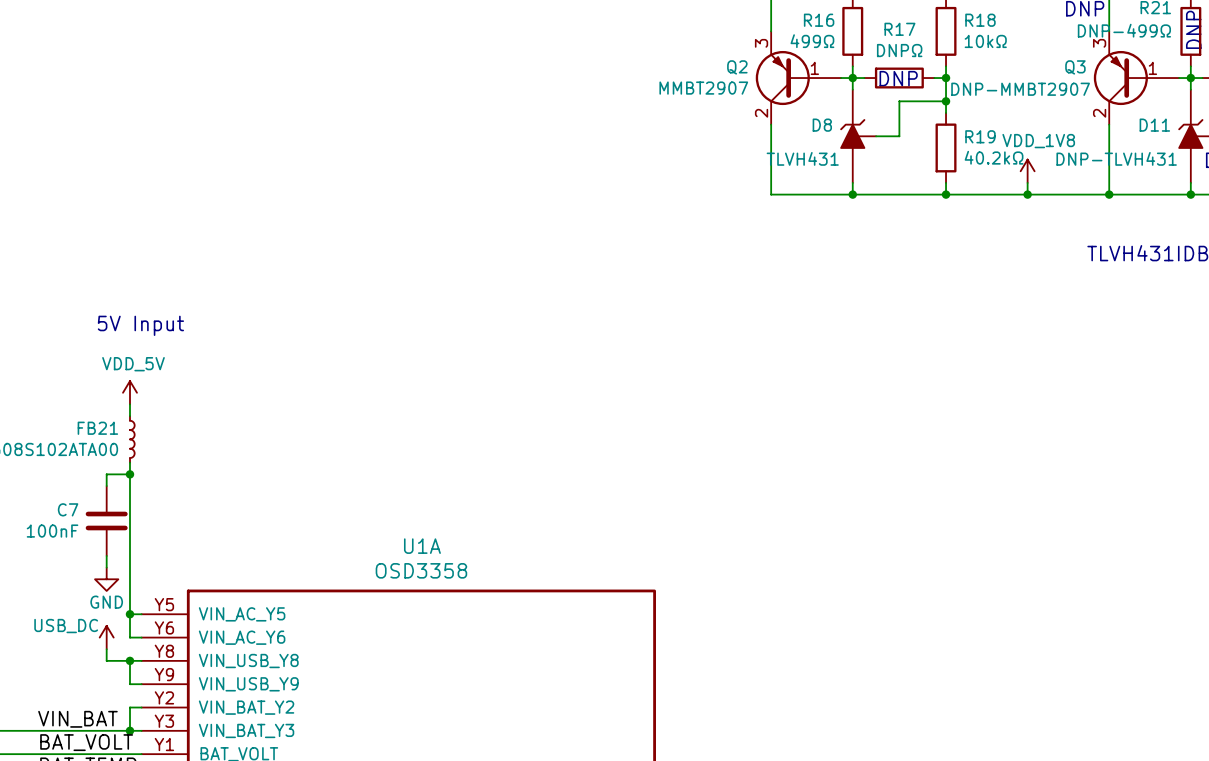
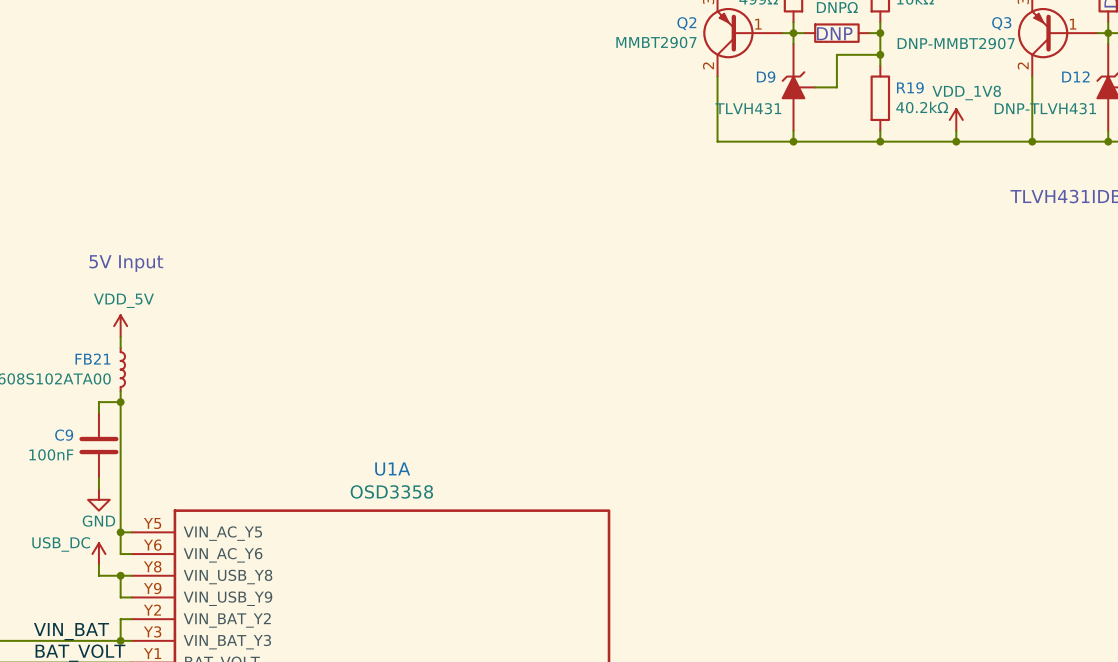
D8 name: D8 (822, 125) -> D9 (766, 77)
D11 name: D11 (1154, 125) -> D12 (1075, 76)
C7 name: C7 (68, 509) -> C9 (64, 435)

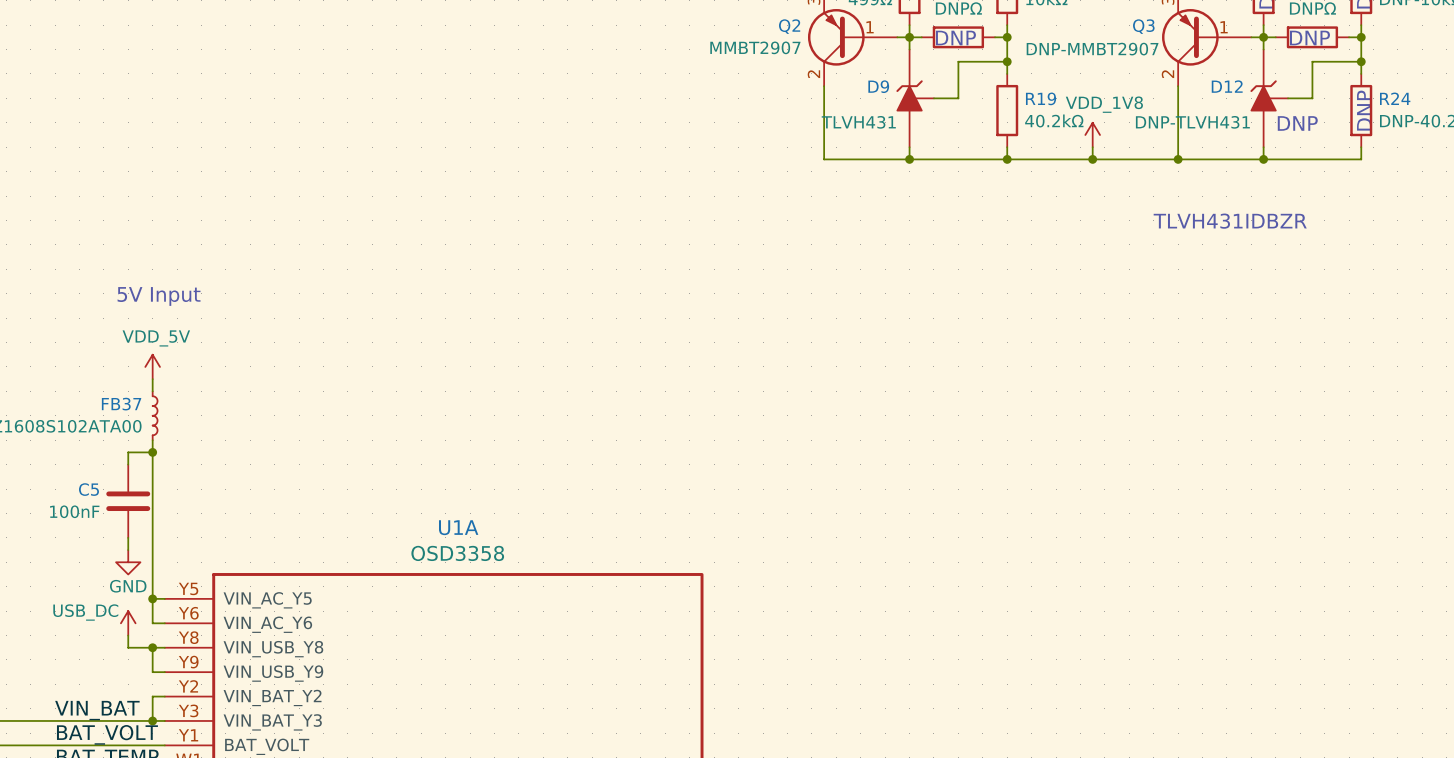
FB21 name: FB21 (92, 359) -> FB37 (121, 404)
C9 name: C9 (64, 435) -> C5 (88, 489)

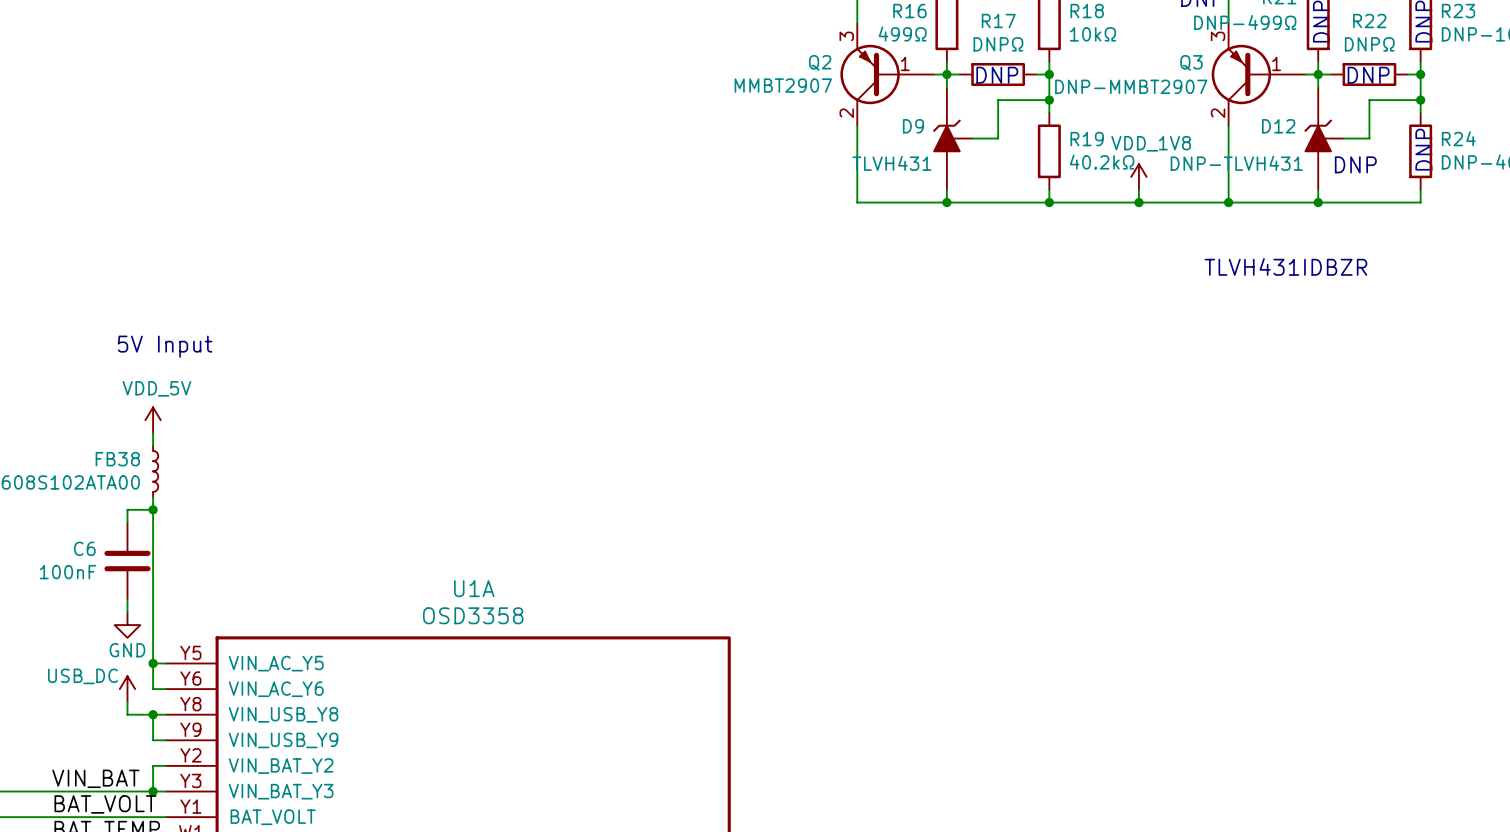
FB37 name: FB37 (121, 404) -> FB38 (117, 459)
C5 name: C5 (88, 489) -> C6 (84, 548)

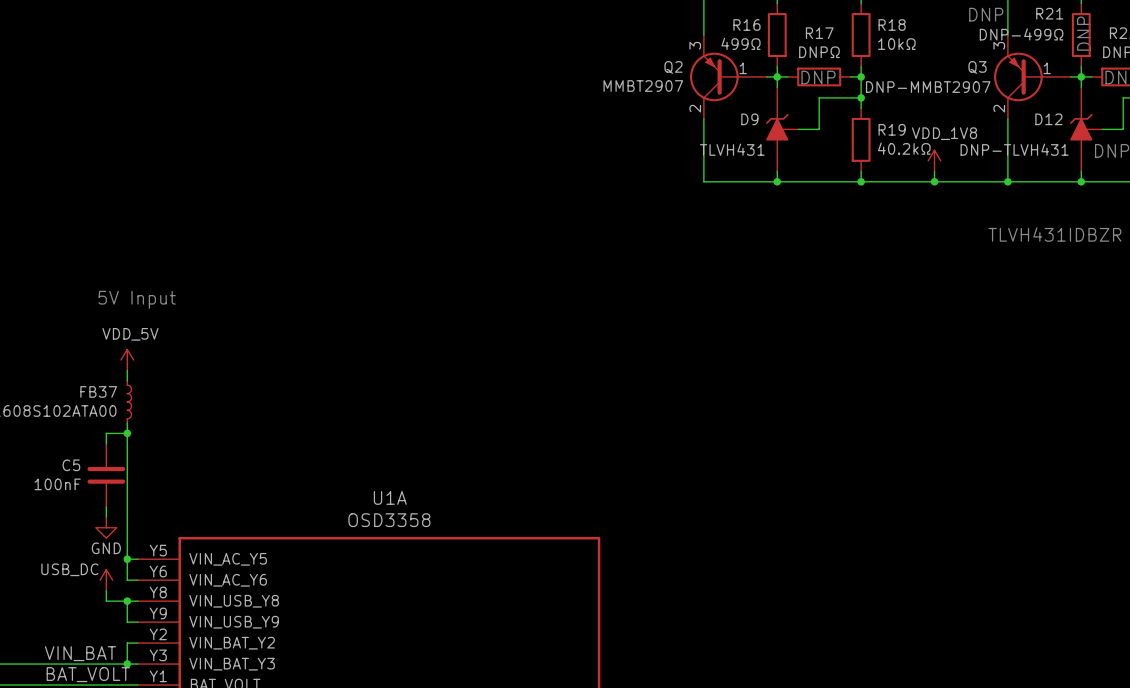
FB38 name: FB38 (117, 459) -> FB37 (98, 391)
C6 name: C6 (84, 548) -> C5 (71, 465)

